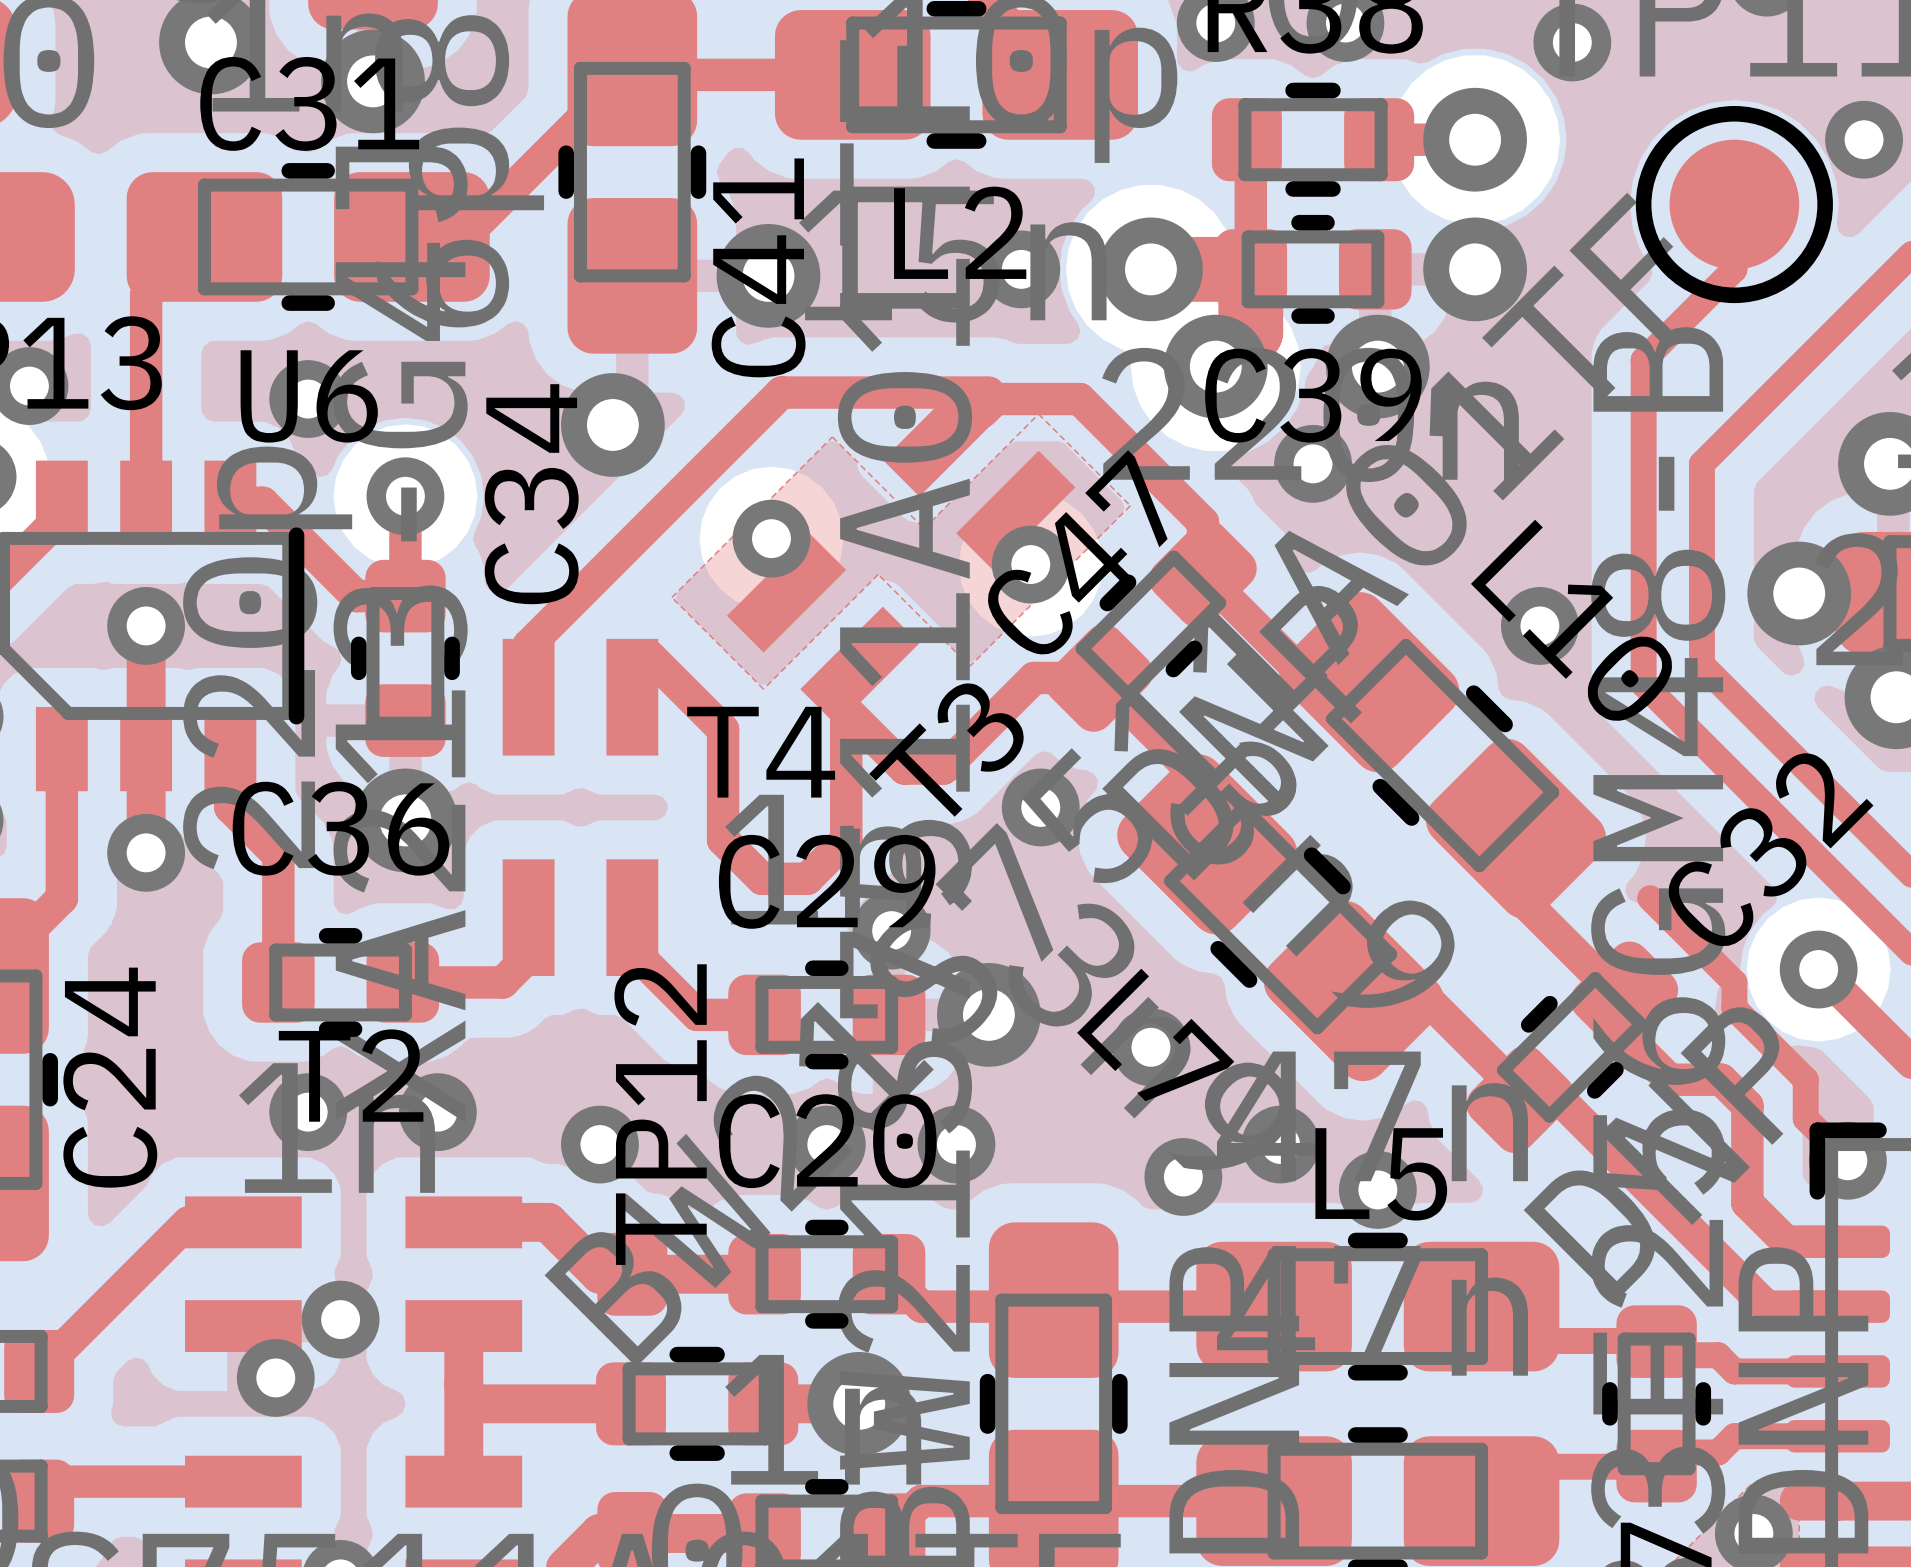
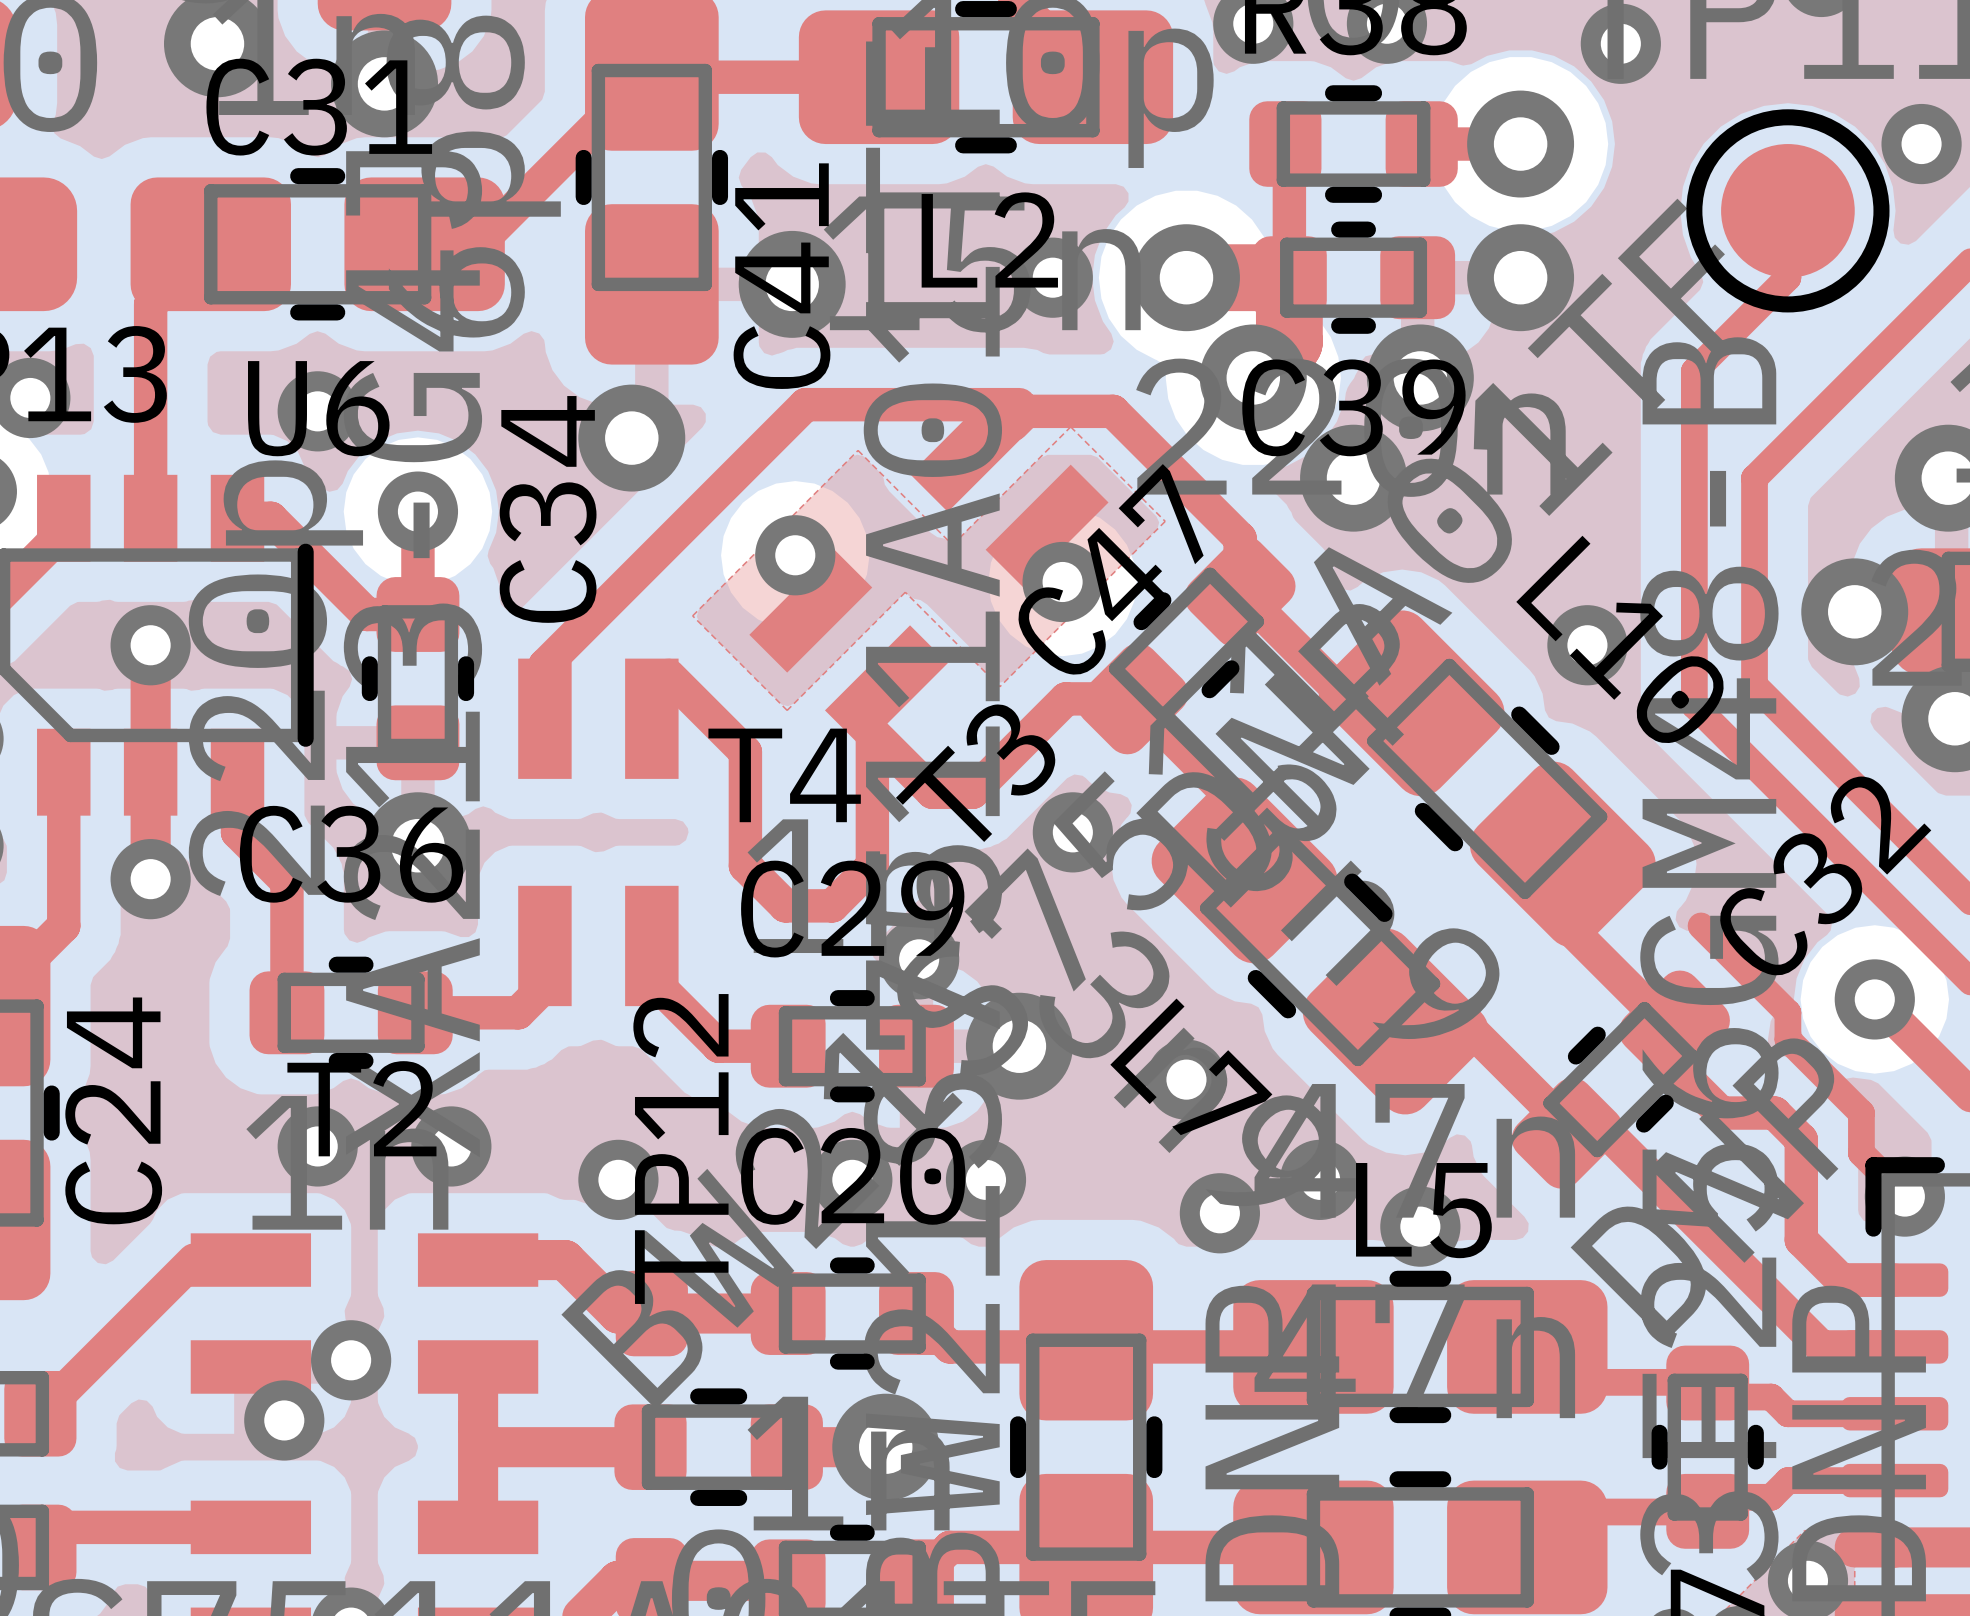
via size: [1274, 424, 1352, 503] -> [1300, 424, 1408, 532]

